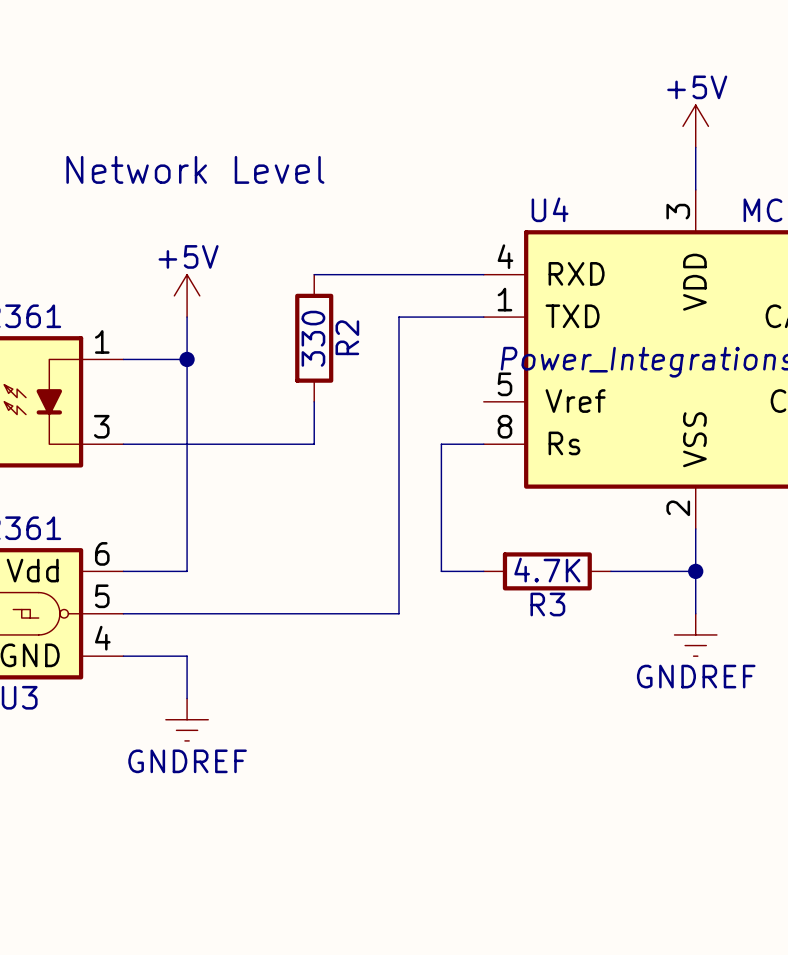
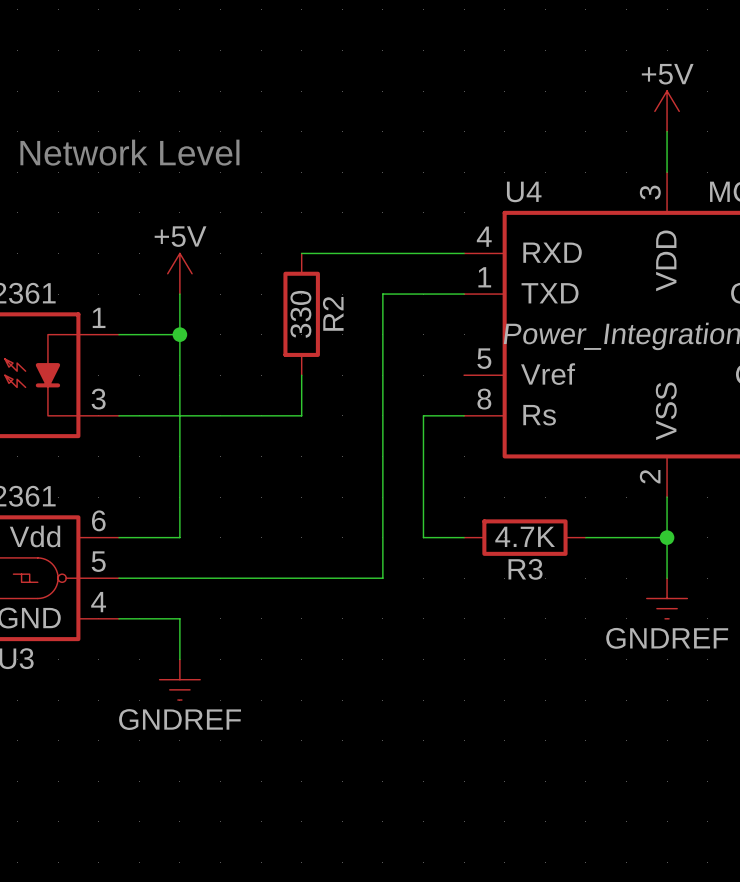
text position: Network Level (195, 169) -> Network Level (129, 152)

